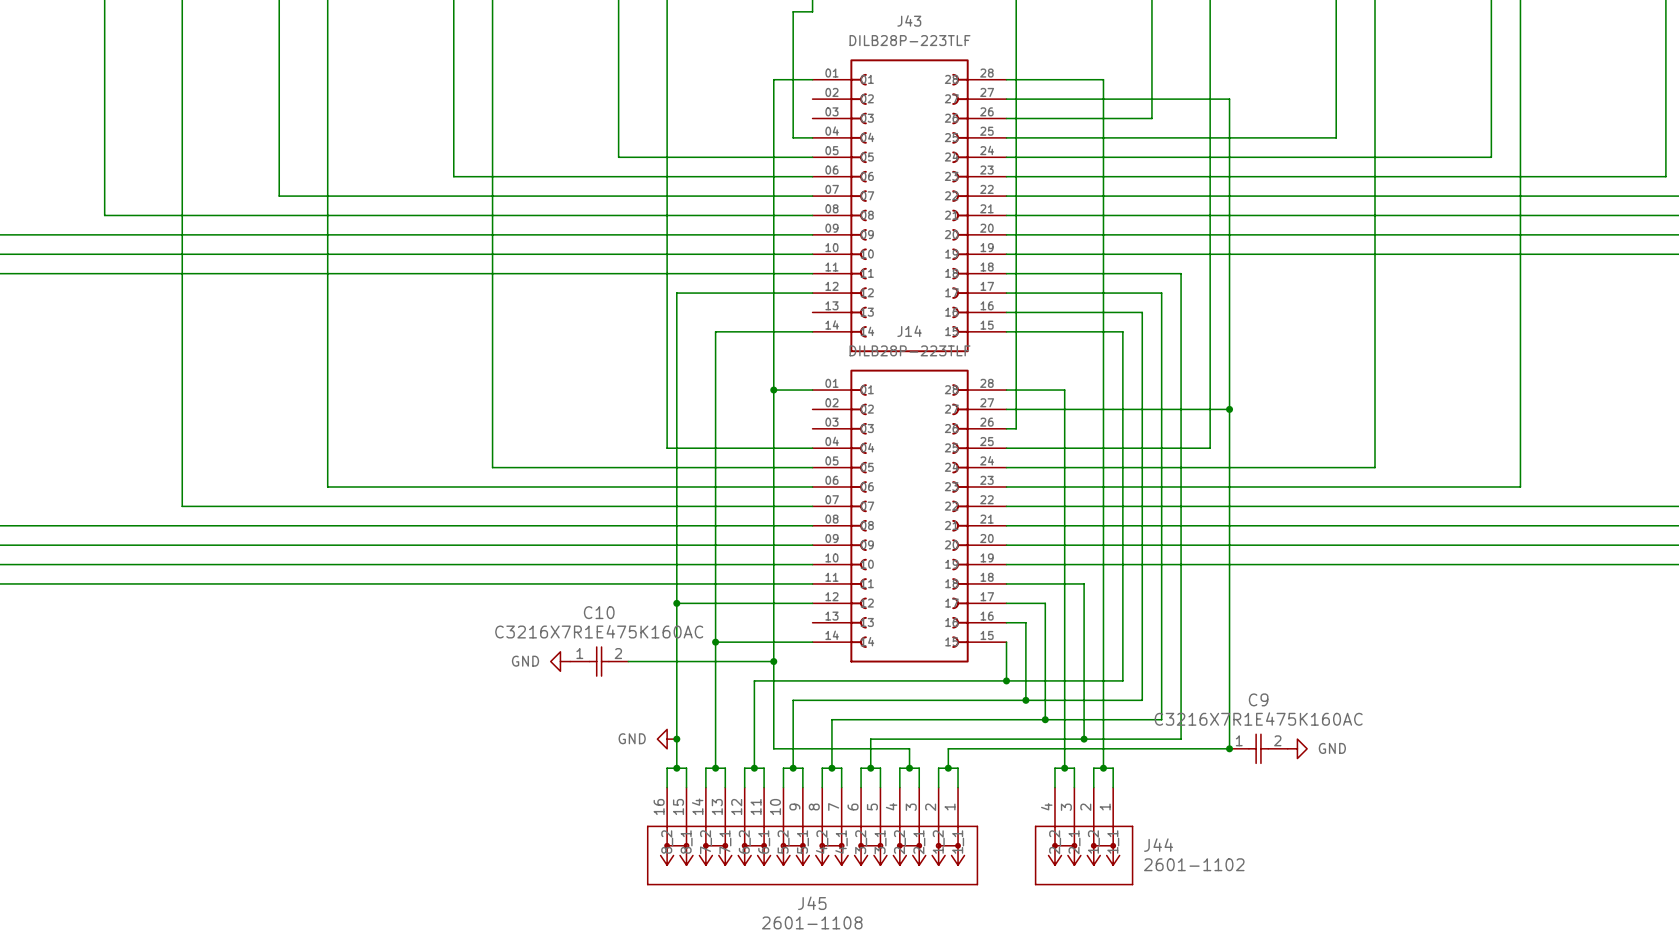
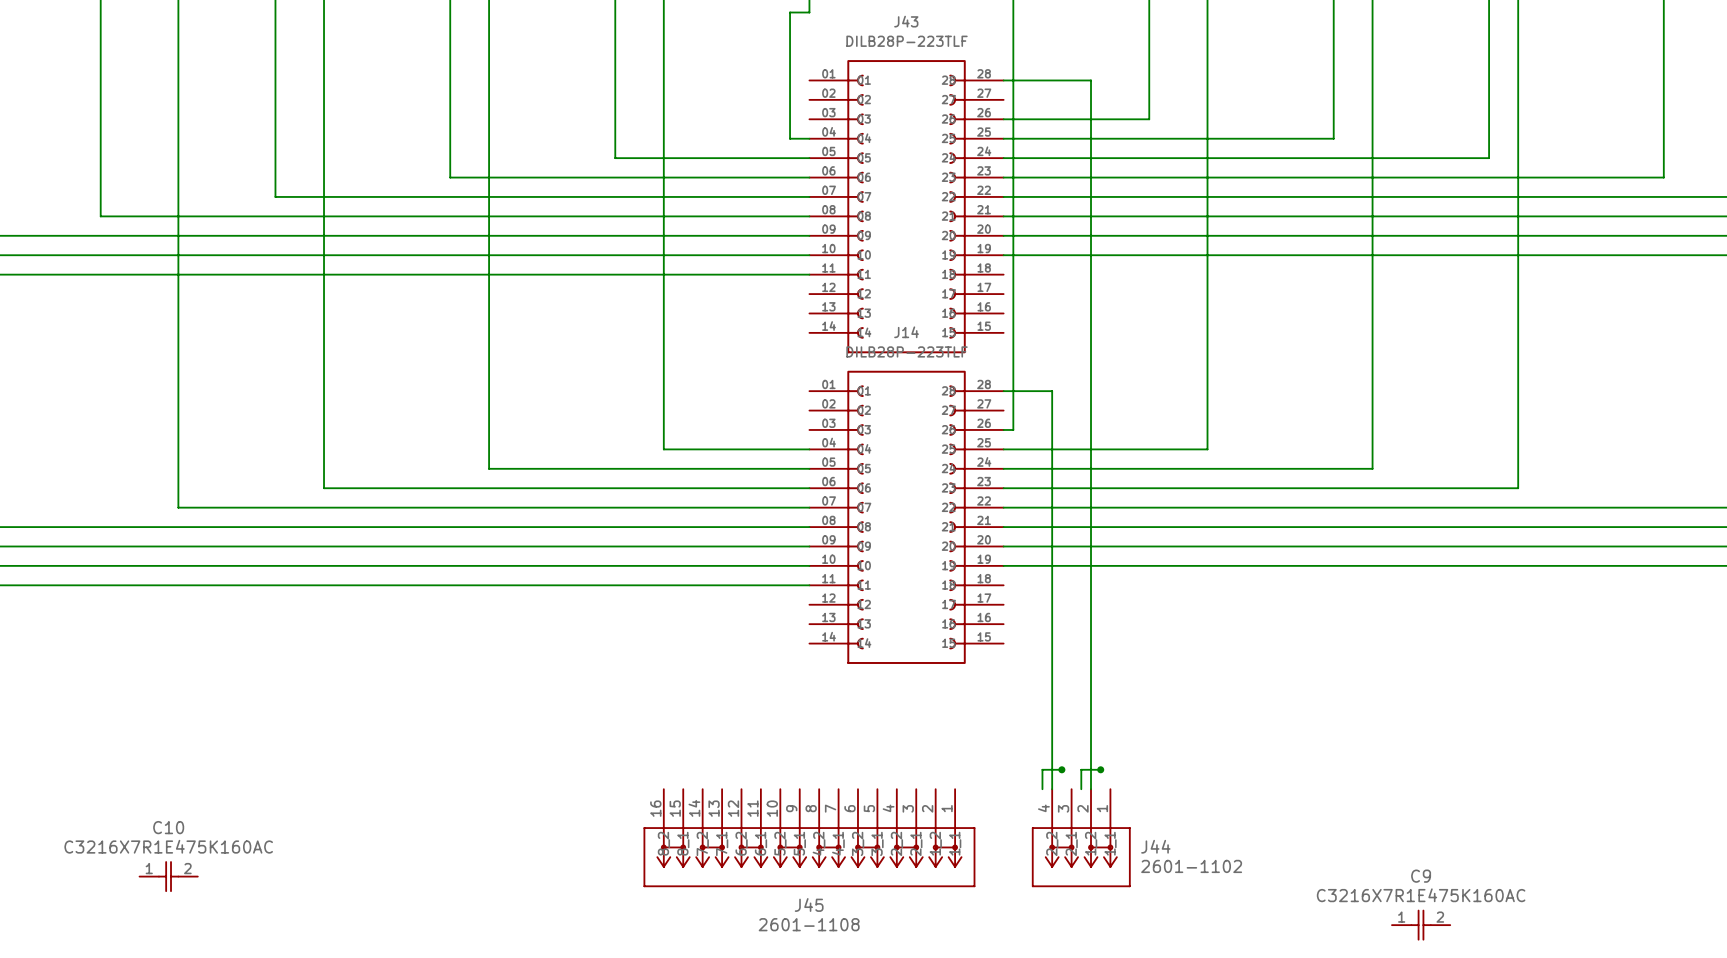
wire: (812, 79) (773, 79) (773, 748) (909, 748) (909, 768) -> none
wire: (1093, 79) (1103, 79) (1103, 768) (1113, 768) (1113, 787) -> (1091, 80) (1091, 769) (1081, 769) (1081, 789)
wire: (1006, 99) (1229, 99) (1229, 748) (948, 748) (948, 768) -> none
wire: (1006, 273) (1181, 273) (1181, 739) (870, 739) (870, 768) -> none
wire: (812, 293) (676, 293) (676, 768) -> none
wire: (1006, 293) (1161, 293) (1161, 719) (831, 719) (831, 768) -> none
wire: (1006, 312) (1142, 312) (1142, 700) (793, 700) (793, 768) -> none
wire: (812, 331) (715, 331) (715, 768) -> none
wire: (1006, 331) (1122, 331) (1122, 680) (754, 680) (754, 768) -> none
wire: (773, 390) (812, 390) -> none
junction: (773, 390) -> none
wire: (1054, 390) (1064, 390) (1064, 768) (1074, 768) (1074, 787) -> (1052, 391) (1052, 769) (1042, 769) (1042, 789)
wire: (1006, 409) (1229, 409) -> none
junction: (1229, 409) -> none
wire: (1006, 583) (1084, 583) (1084, 739) -> none
wire: (676, 603) (812, 603) -> none
junction: (676, 603) -> none
wire: (1006, 603) (1045, 603) (1045, 719) -> none
wire: (1006, 622) (1025, 622) (1025, 700) -> none
wire: (715, 642) (812, 642) -> none
junction: (715, 642) -> none
wire: (1006, 642) (1006, 680) -> none
power symbol: GND (560, 661) -> none
C10 position: (599, 661) -> (168, 876)
wire: (628, 661) (773, 661) -> none
junction: (773, 661) -> none
junction: (1006, 680) -> none
junction: (1025, 700) -> none
junction: (1045, 719) -> none
power symbol: GND (667, 739) -> none
junction: (676, 739) -> none
junction: (1084, 739) -> none
junction: (1229, 748) -> none
C9 position: (1258, 748) -> (1421, 925)
power symbol: GND (1297, 748) -> none
junction: (676, 768) -> none
junction: (715, 768) -> none
junction: (754, 768) -> none
junction: (793, 768) -> none
junction: (831, 768) -> none
junction: (870, 768) -> none
junction: (909, 768) -> none
junction: (948, 768) -> none
wire: (667, 787) (667, 768) (686, 768) (686, 787) -> none
wire: (705, 787) (705, 768) (725, 768) (725, 787) -> none
wire: (744, 787) (744, 768) (764, 768) (764, 787) -> none
wire: (783, 787) (783, 768) (802, 768) (802, 787) -> none
wire: (822, 787) (822, 768) (841, 768) (841, 787) -> none
wire: (861, 787) (861, 768) (880, 768) (880, 787) -> none
wire: (899, 787) (899, 768) (919, 768) (919, 787) -> none
wire: (938, 787) (938, 768) (958, 768) (958, 787) -> none

